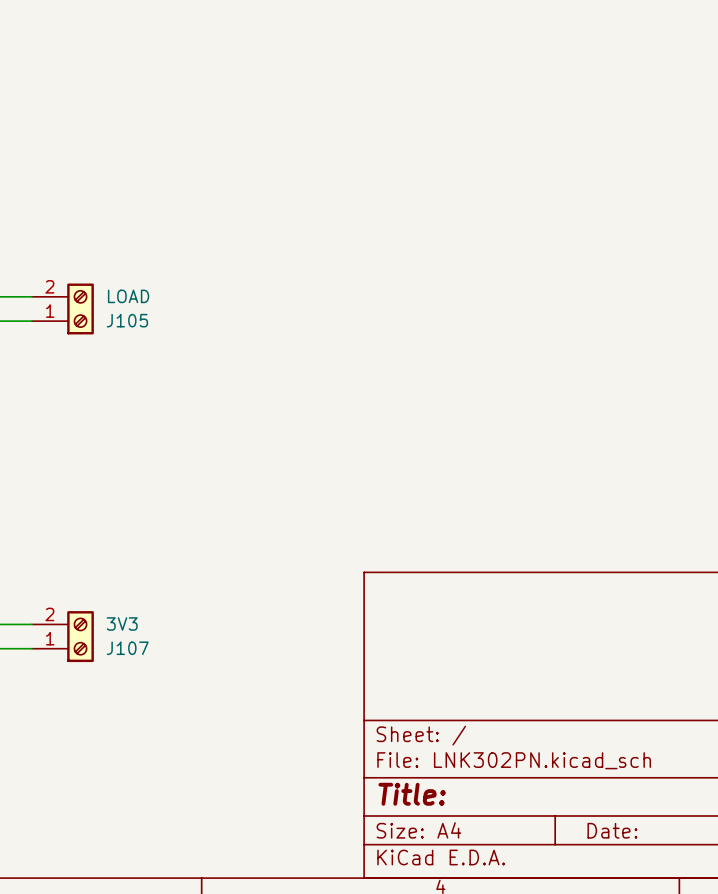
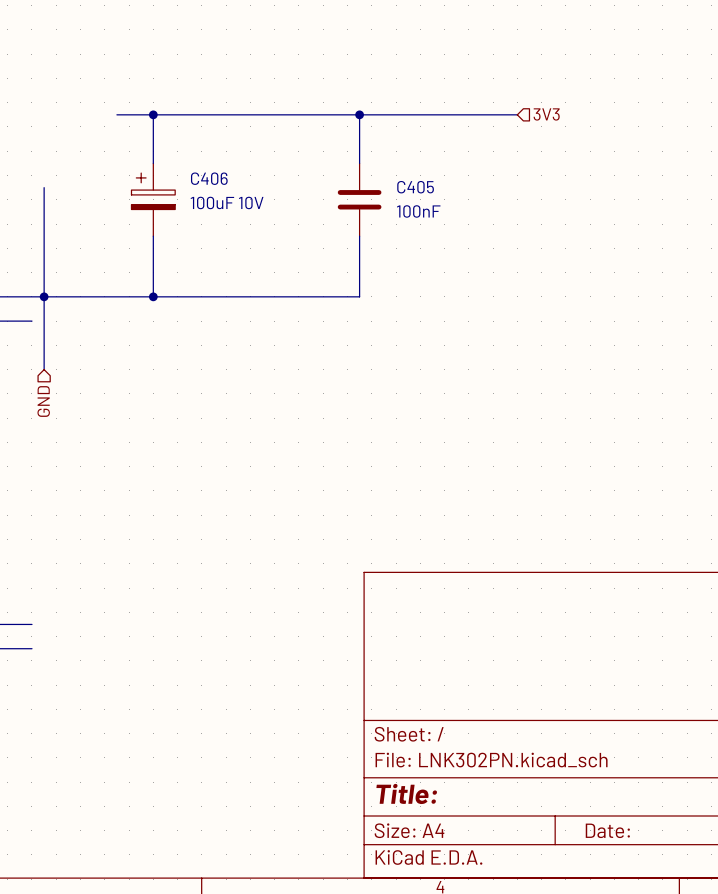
wire: none -> (116, 114) (517, 114)
wire: none -> (153, 114) (153, 163)
junction: none -> (153, 114)
wire: none -> (359, 114) (359, 163)
junction: none -> (359, 114)
hierarchical label: none -> 3V3 (546, 114)
wire: none -> (44, 187) (44, 369)
C406: none -> 100uF 10V (153, 199)
C405: none -> 100nF (359, 199)
wire: none -> (153, 236) (153, 296)
wire: none -> (359, 236) (359, 296) (31, 296)
junction: none -> (44, 296)
junction: none -> (153, 296)
J105: LOAD (62, 308) -> none
hierarchical label: none -> GND (43, 401)
J107: 3V3 (62, 636) -> none

